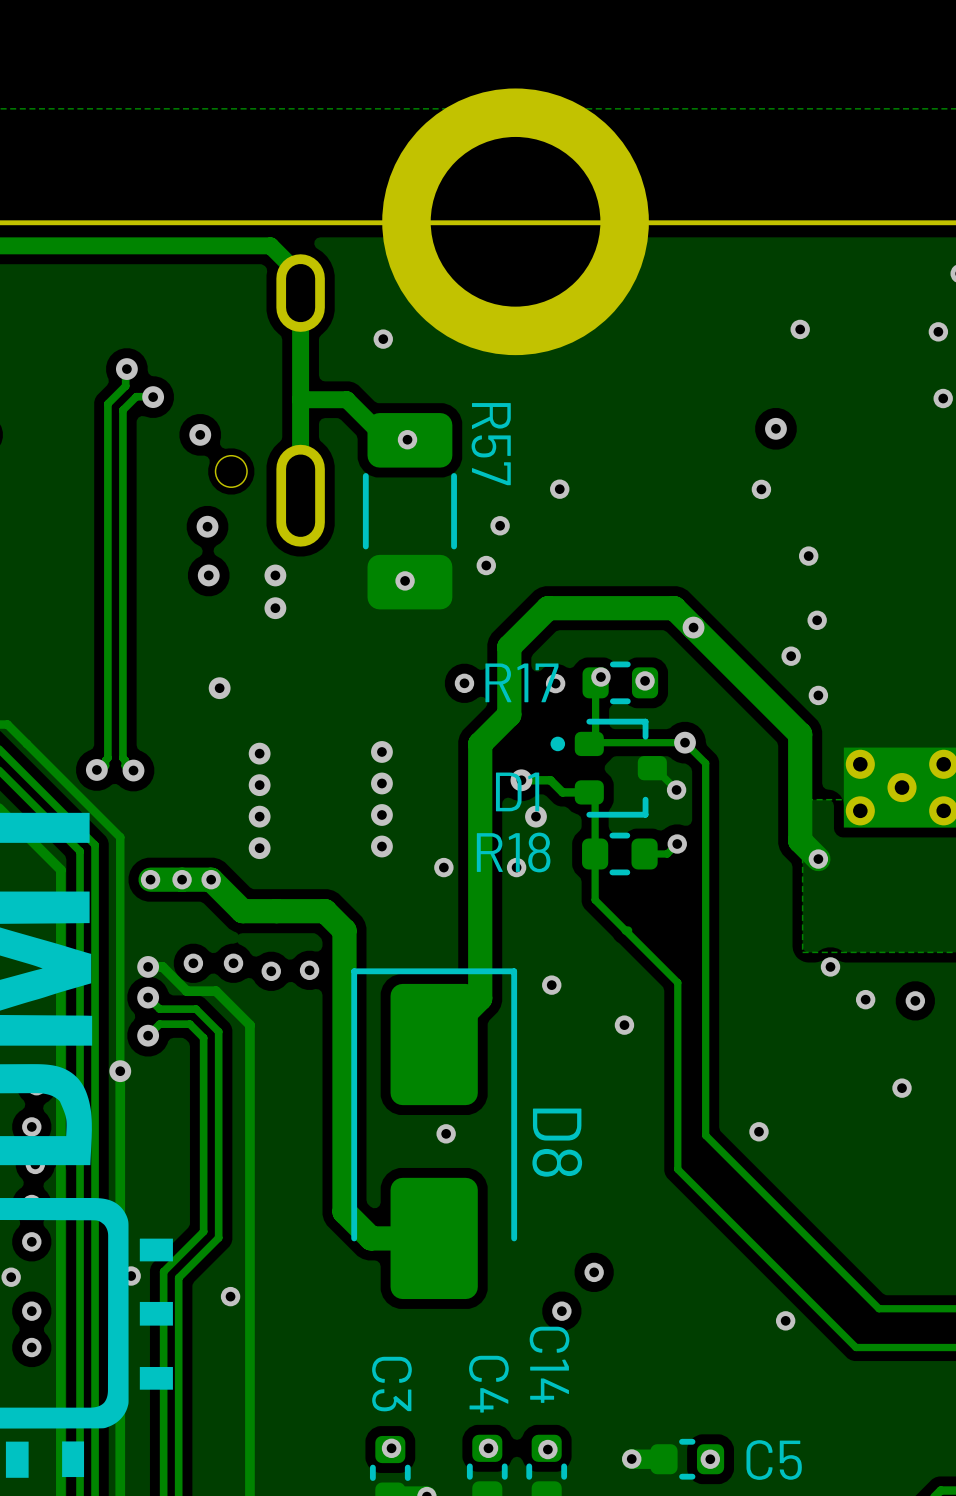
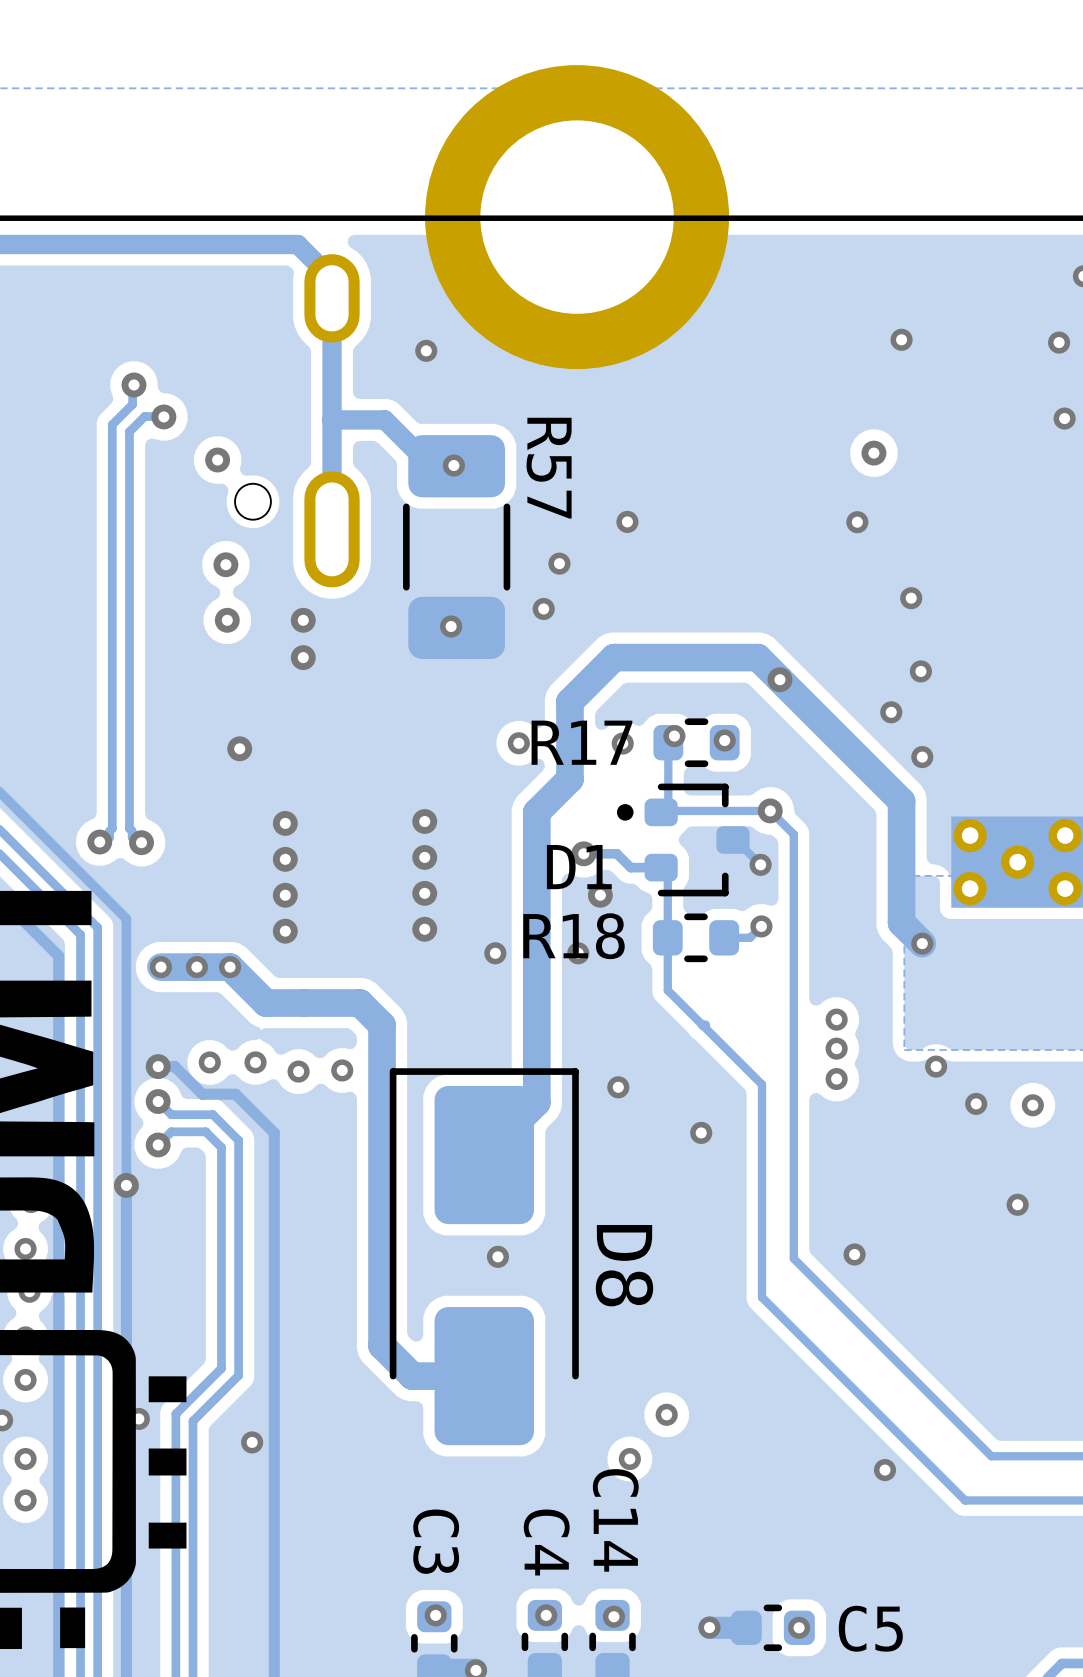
via: none -> (836, 1019)
via: none -> (836, 1048)
via: none -> (836, 1079)

